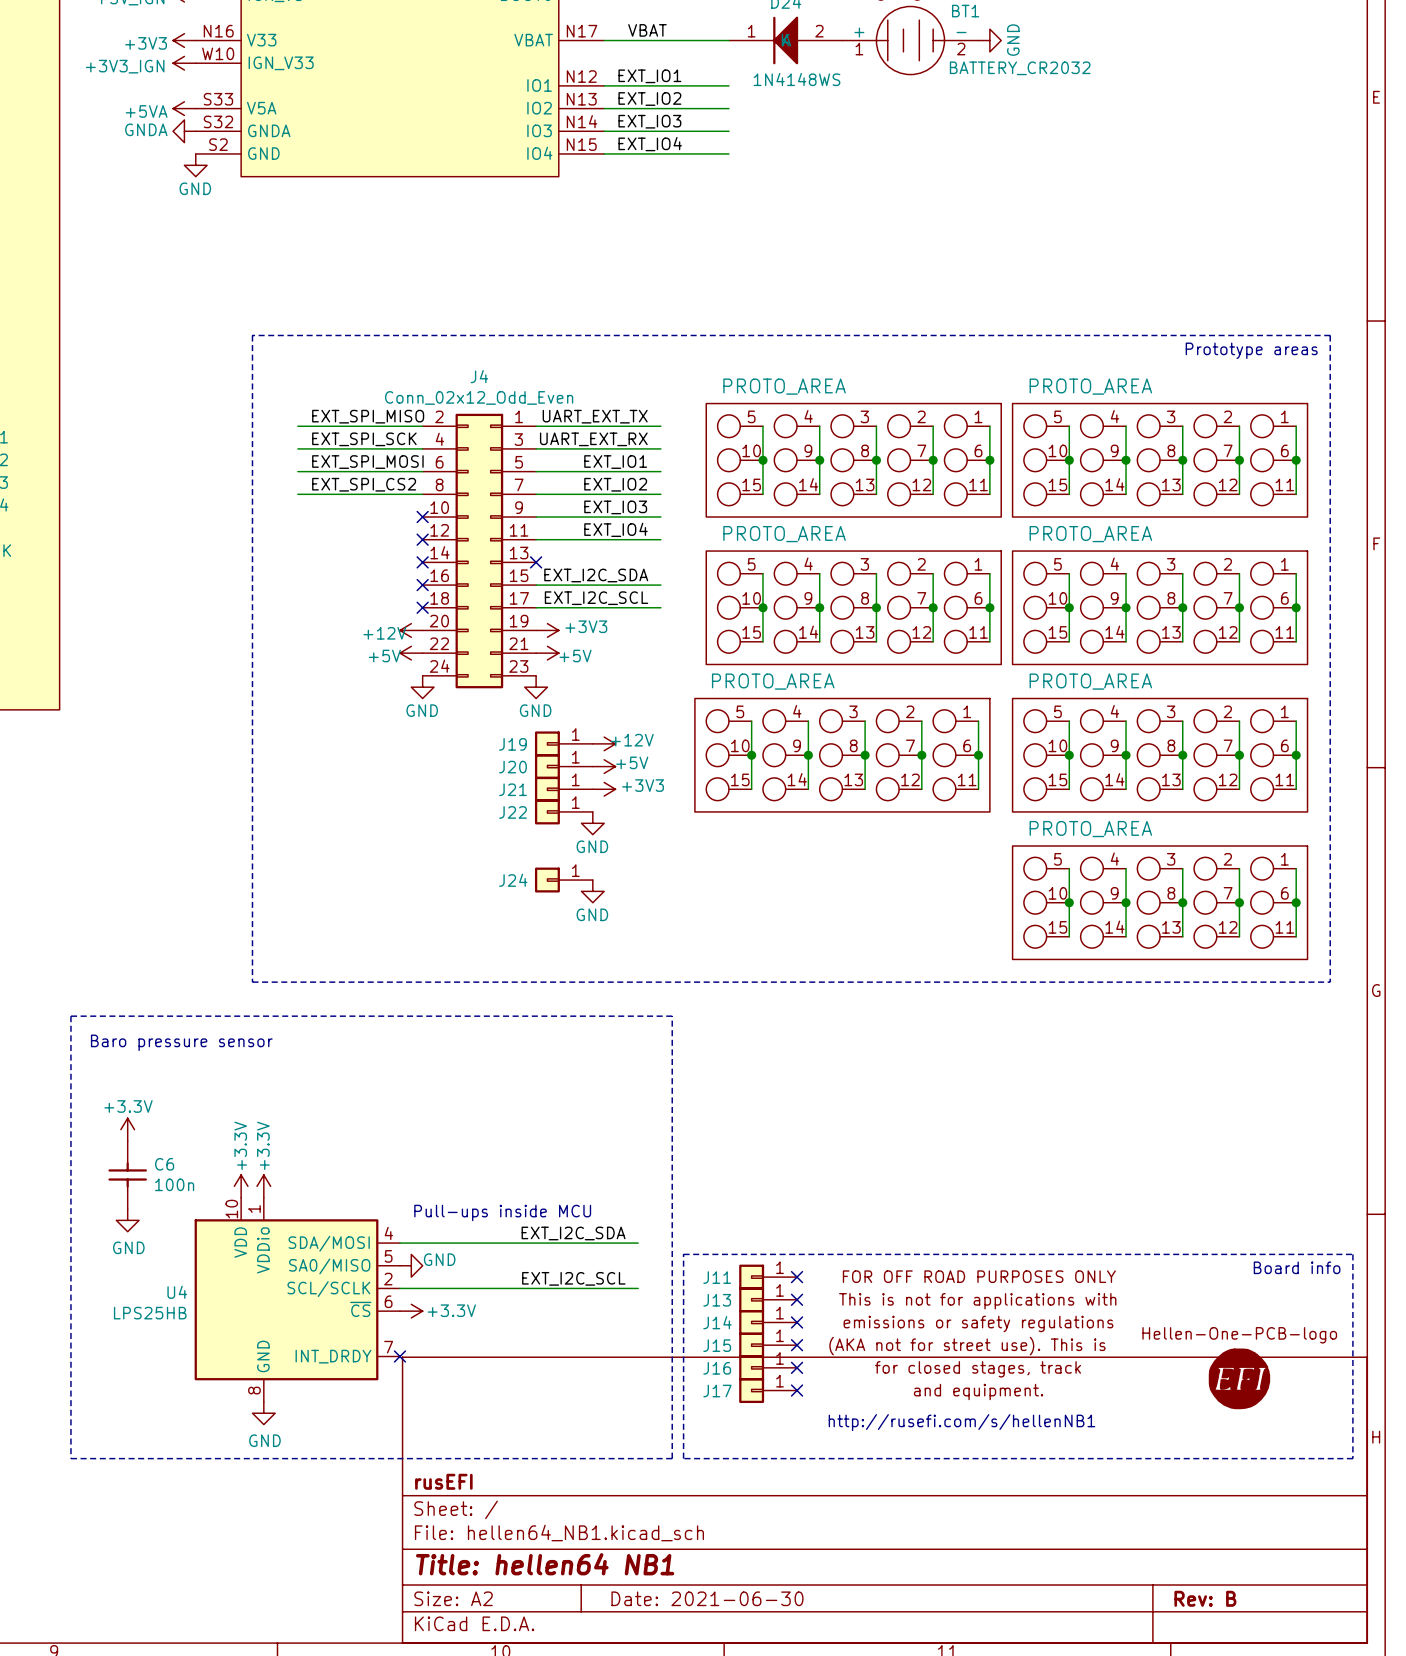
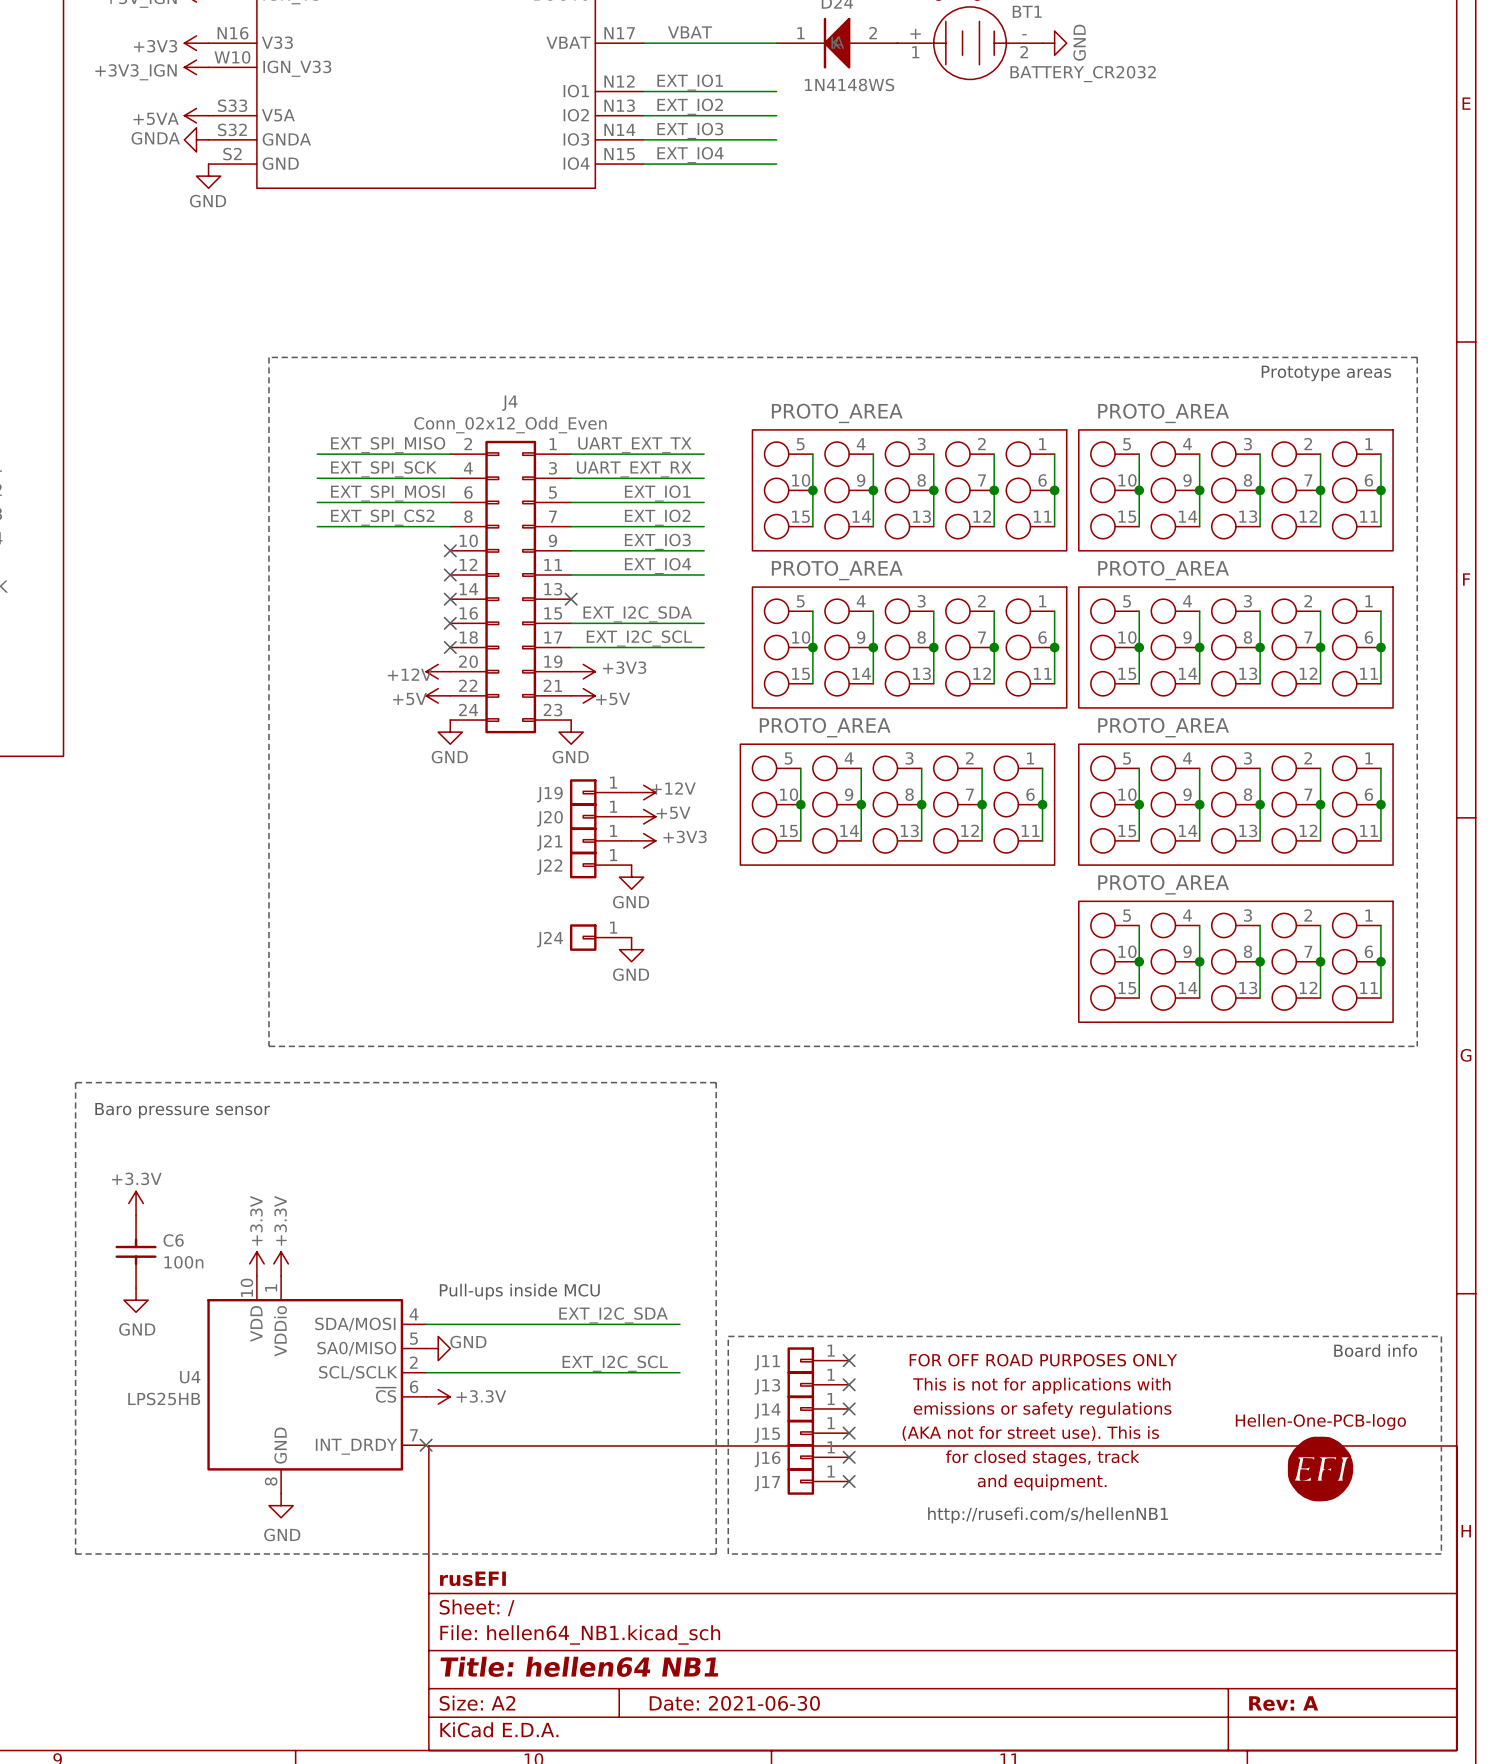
title block: Rev: B (1205, 1598) -> Rev: A (1283, 1703)

